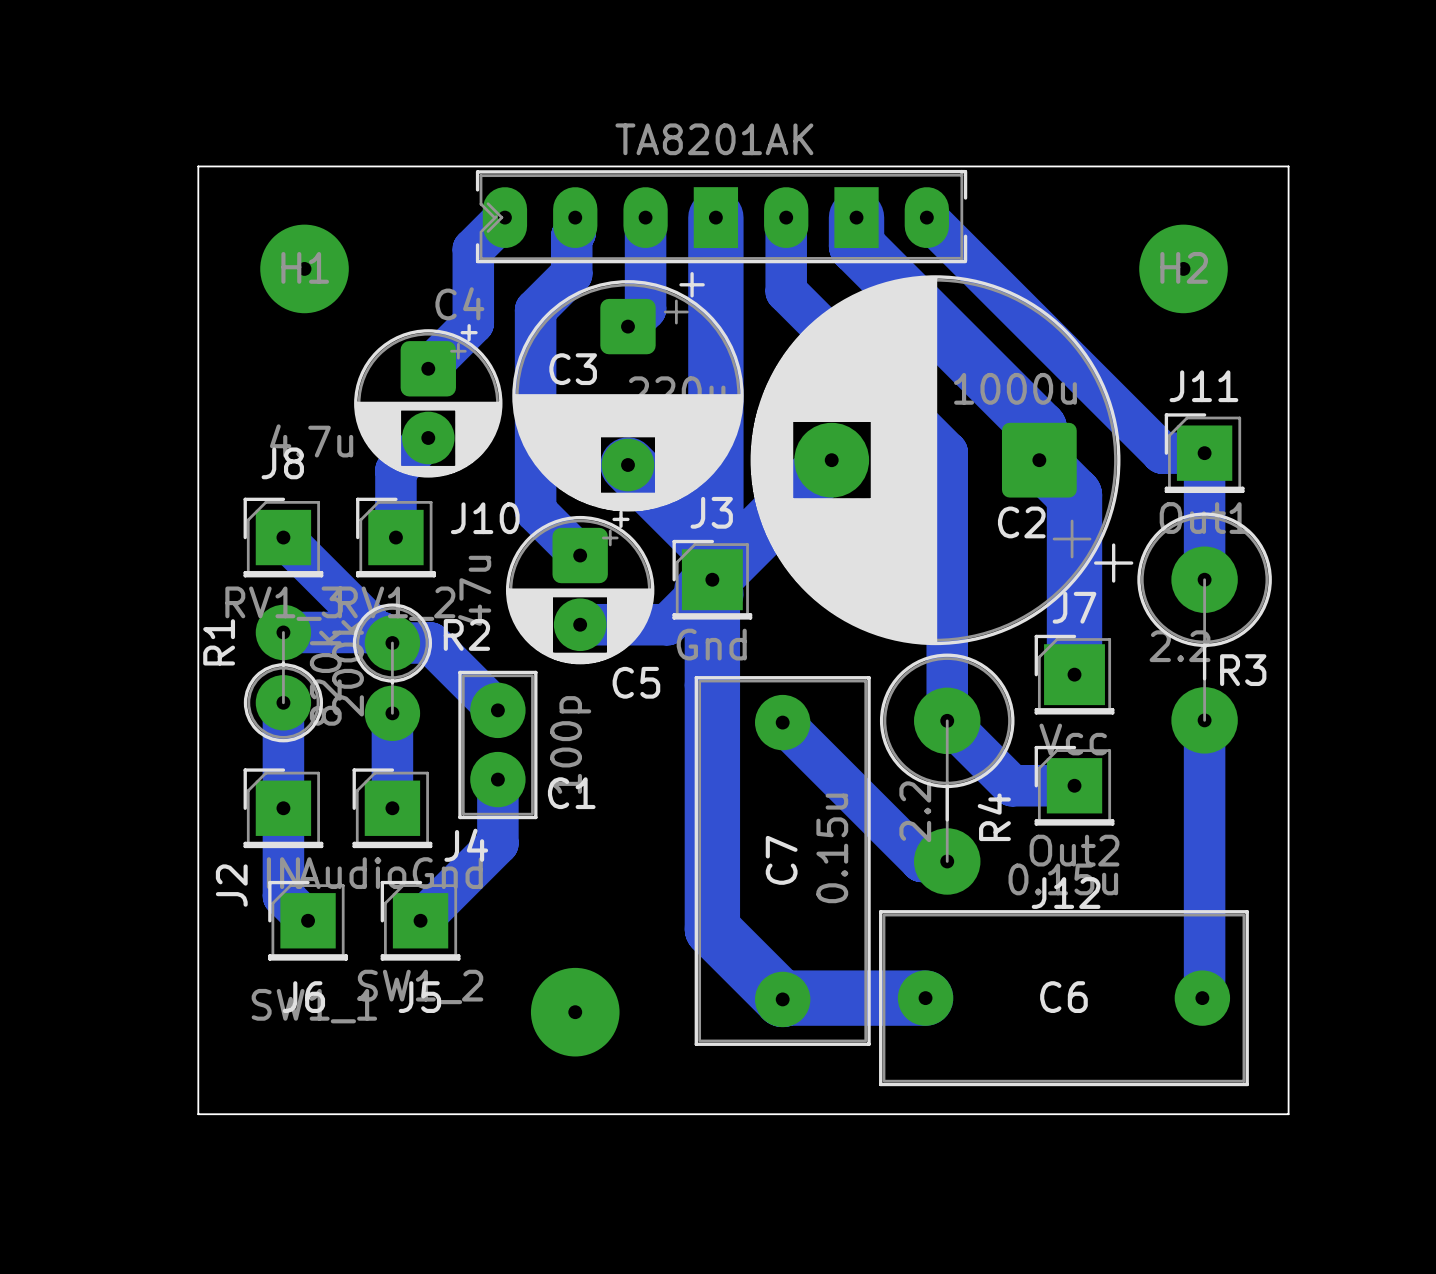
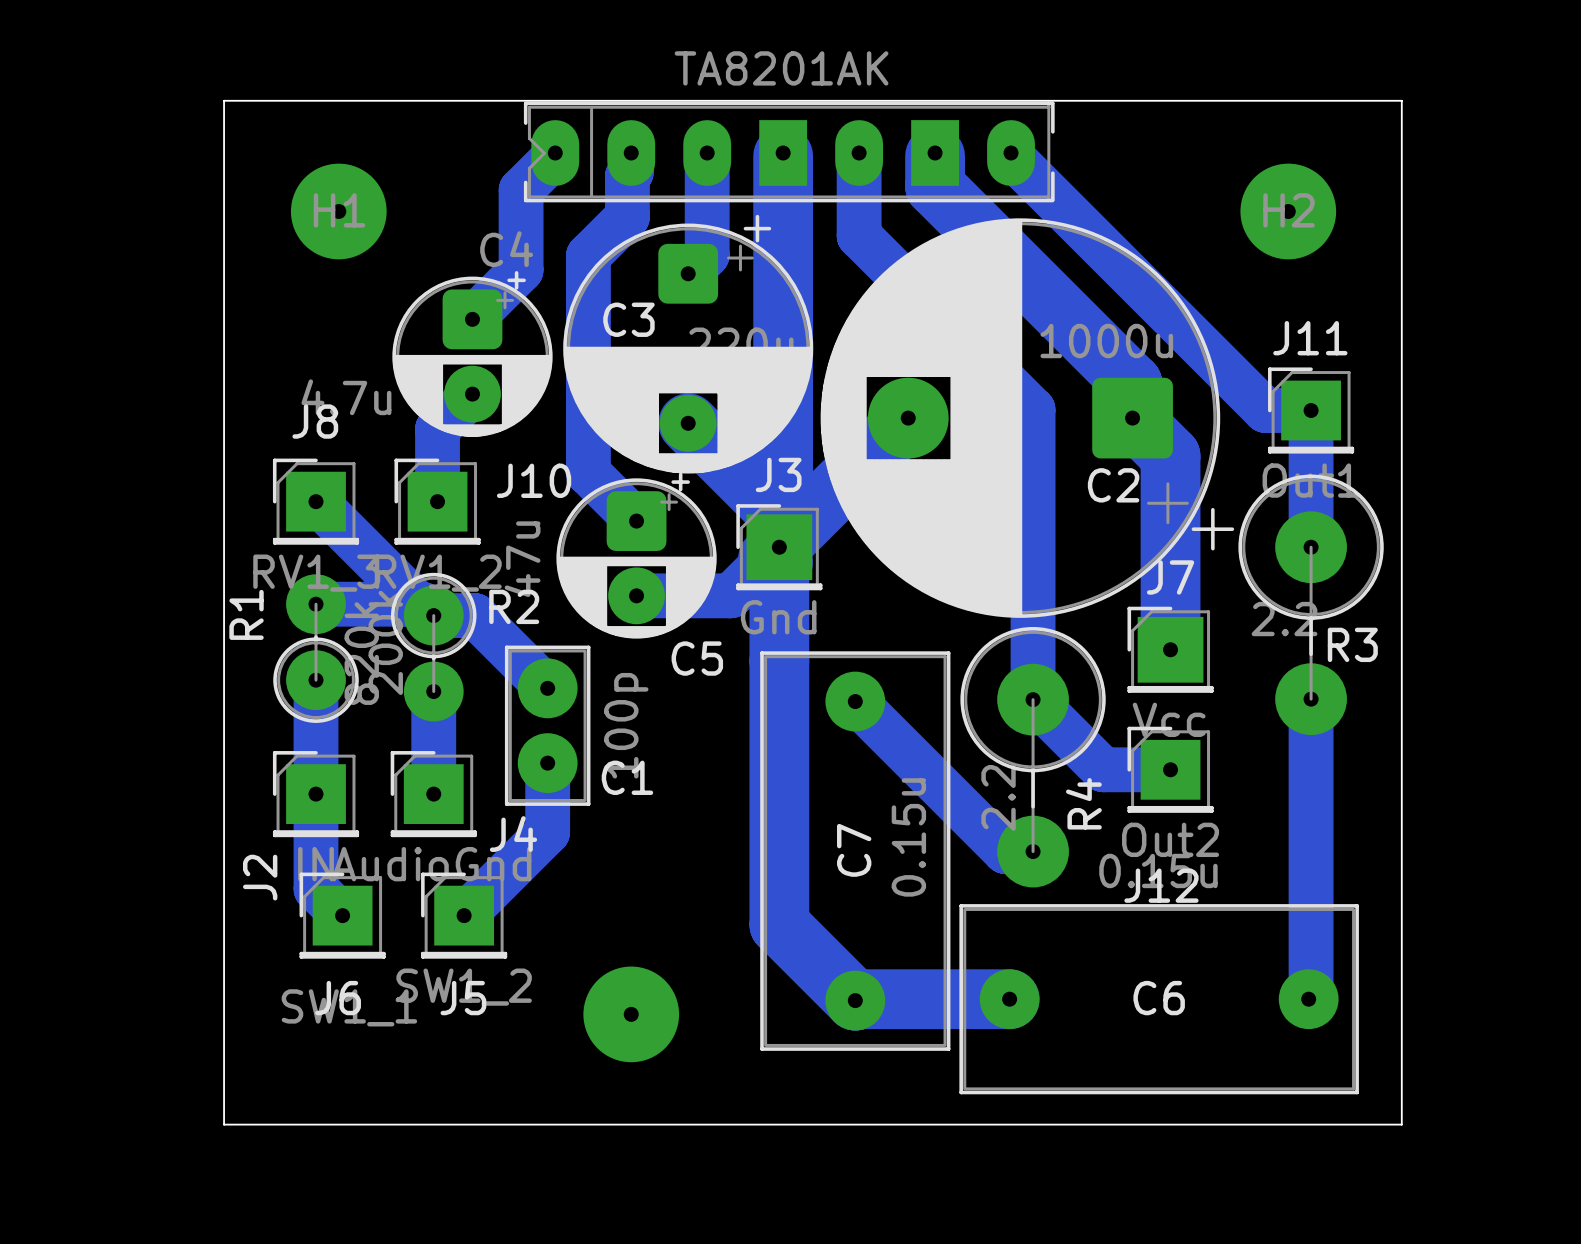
part footprint: [475, 169, 968, 264] -> [523, 101, 1055, 203]

